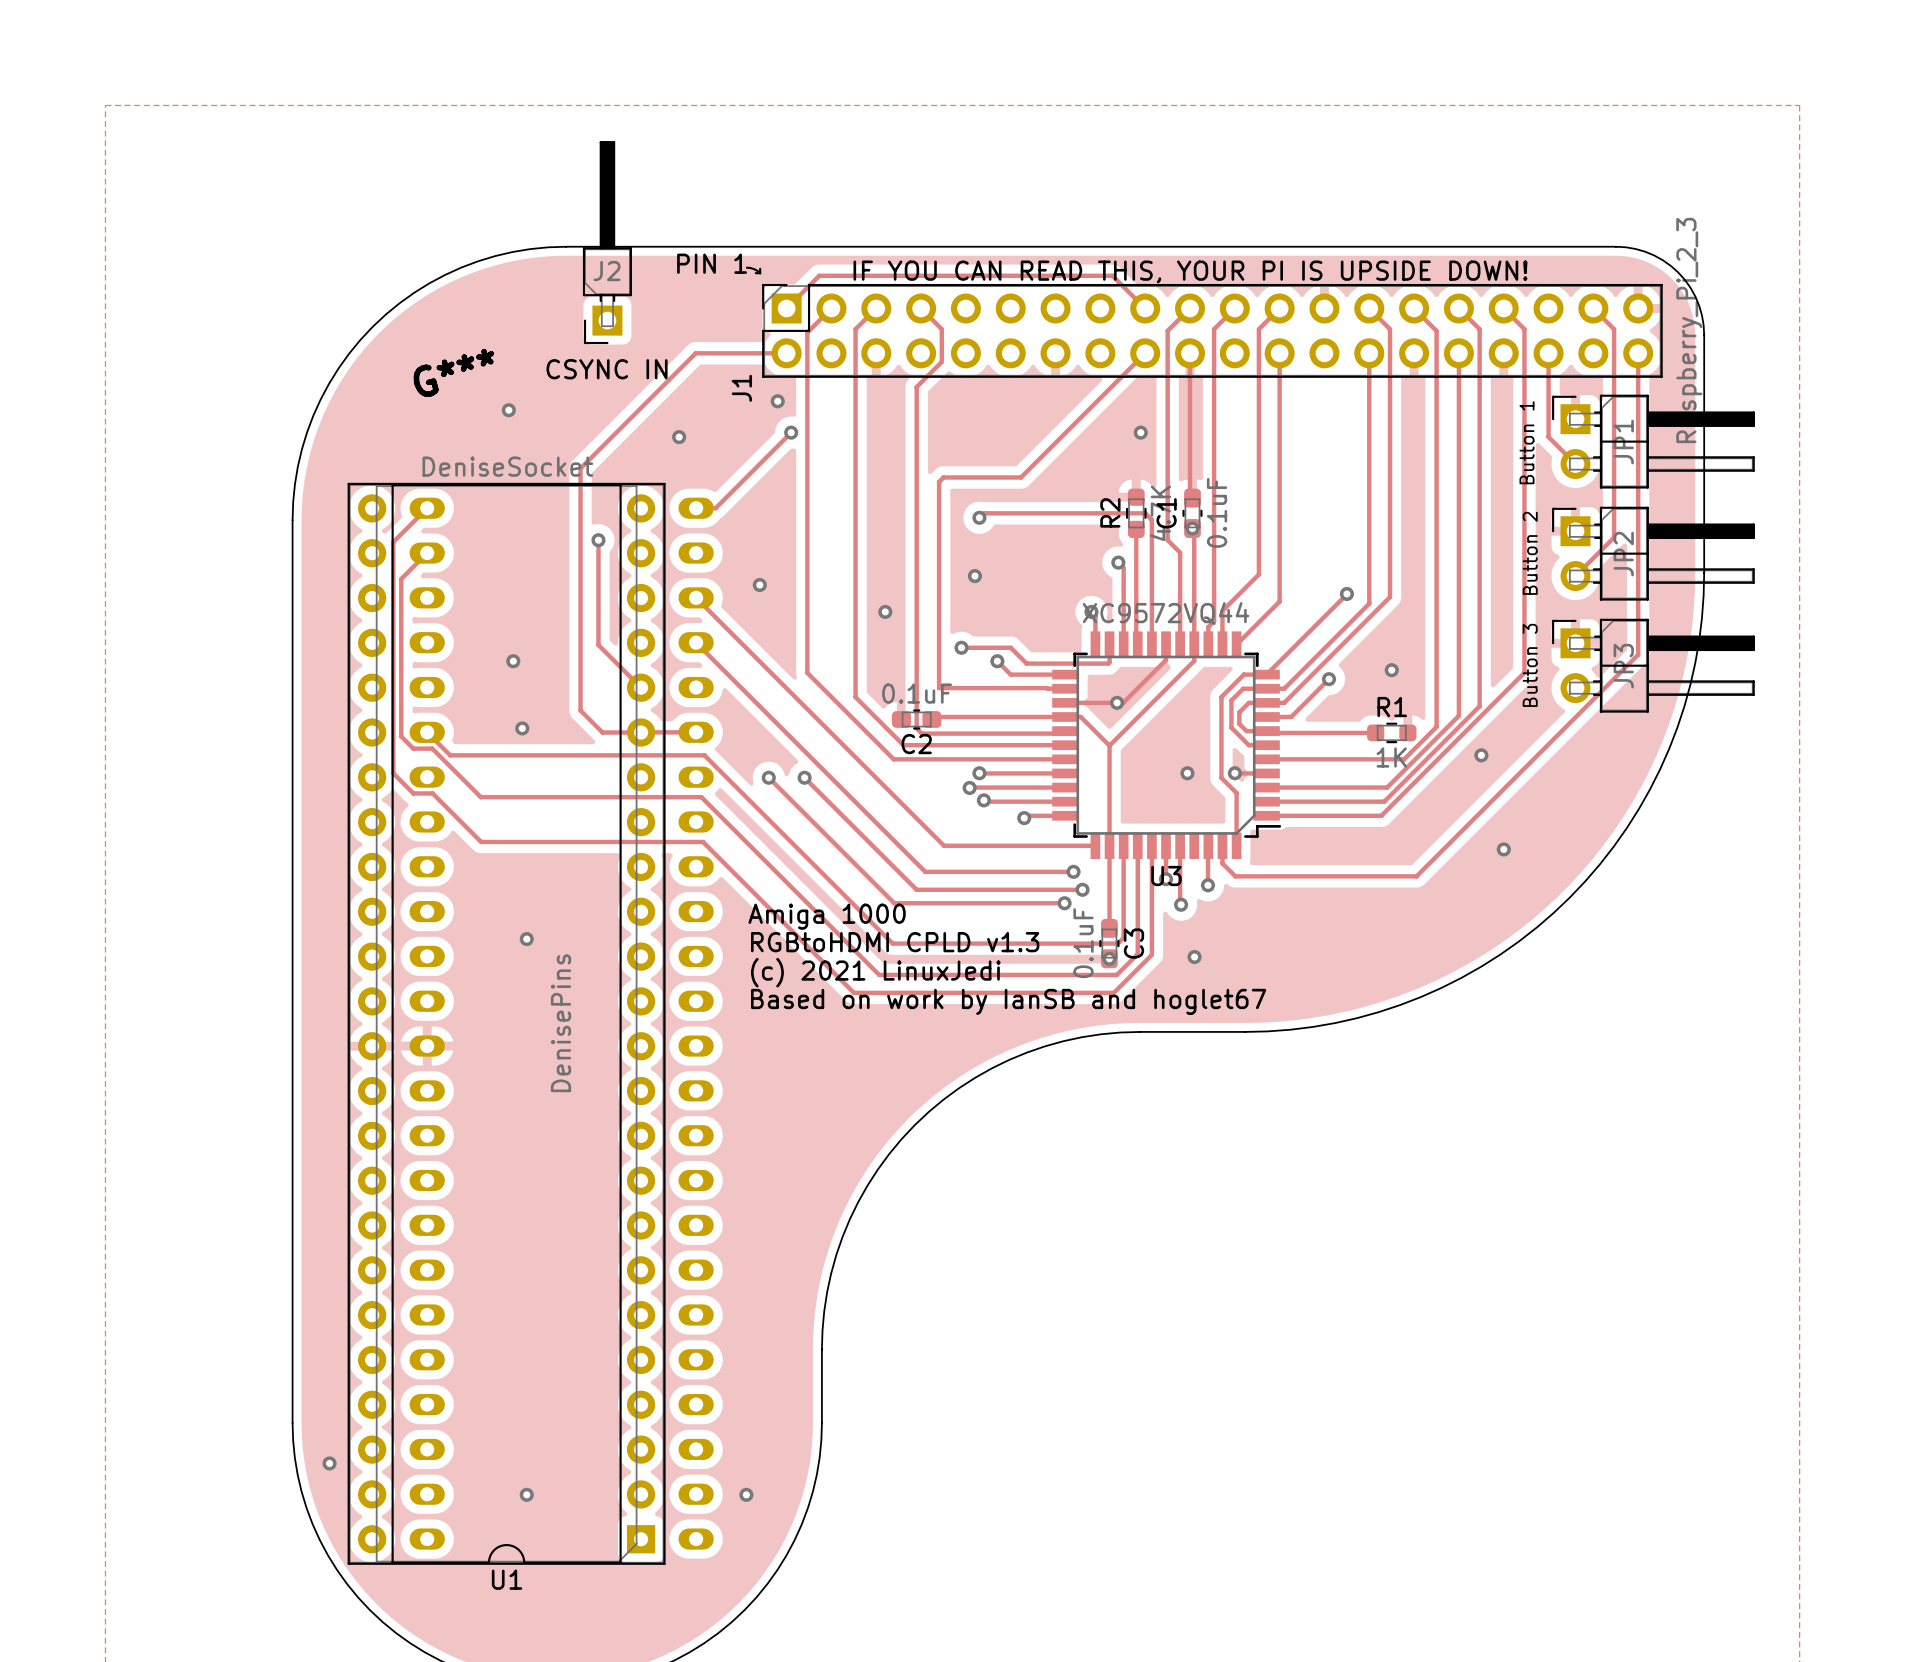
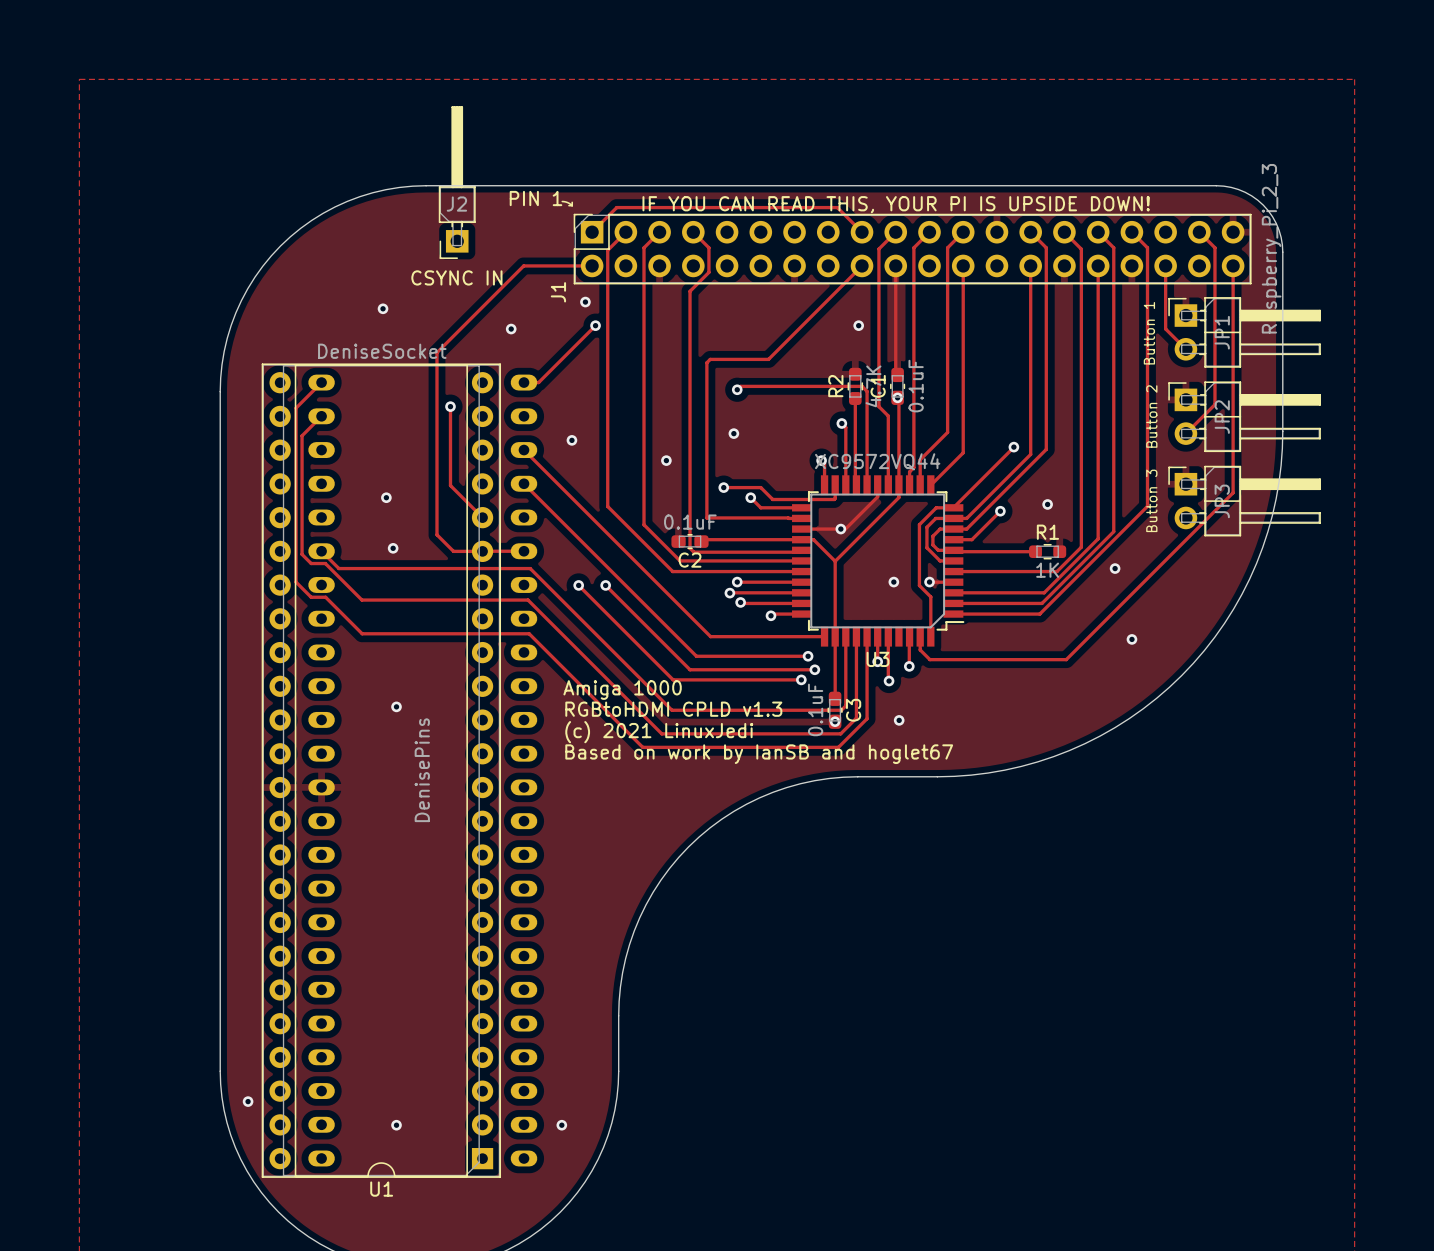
G***: (453, 372) -> none

